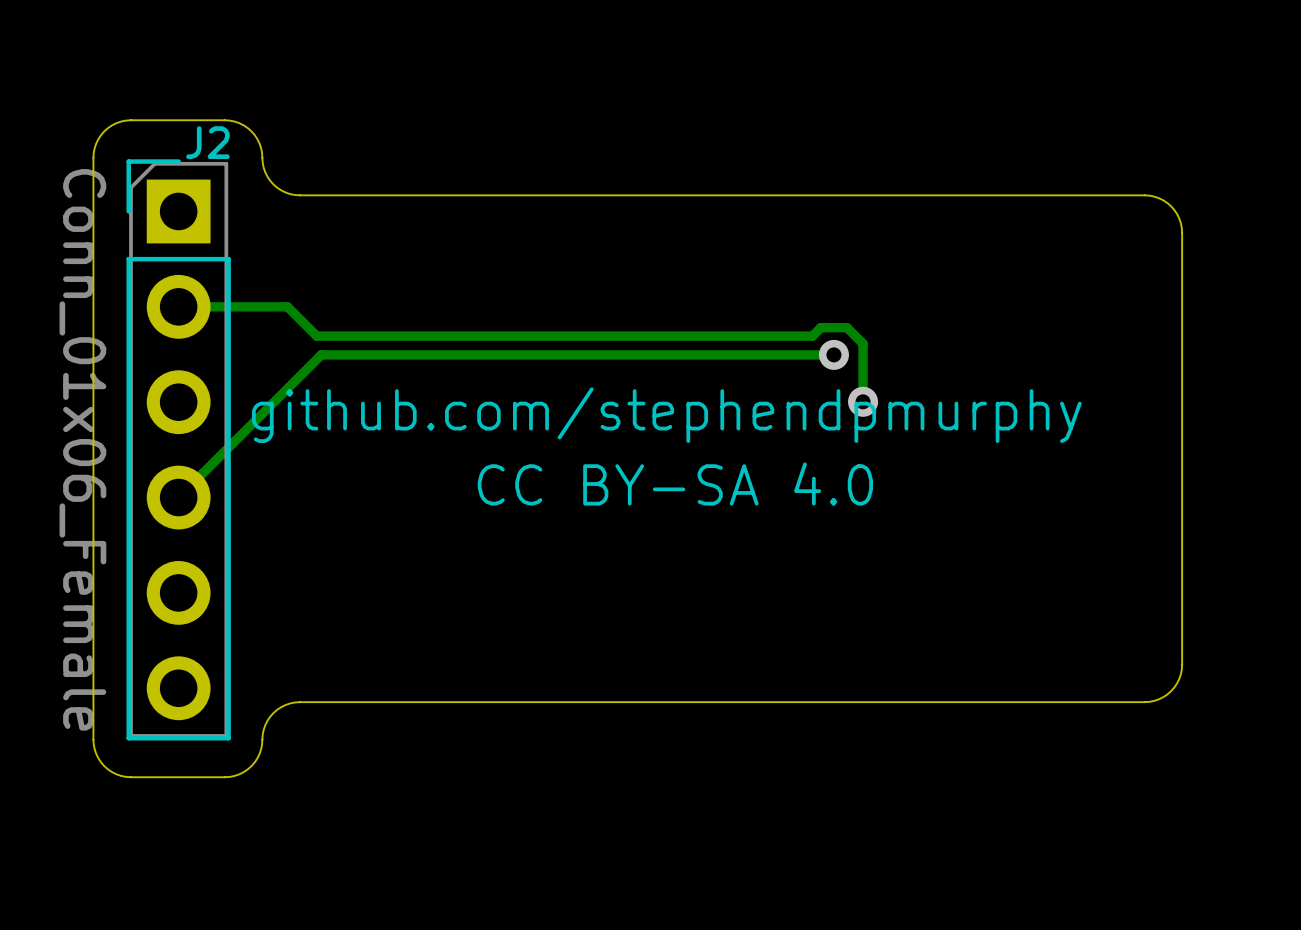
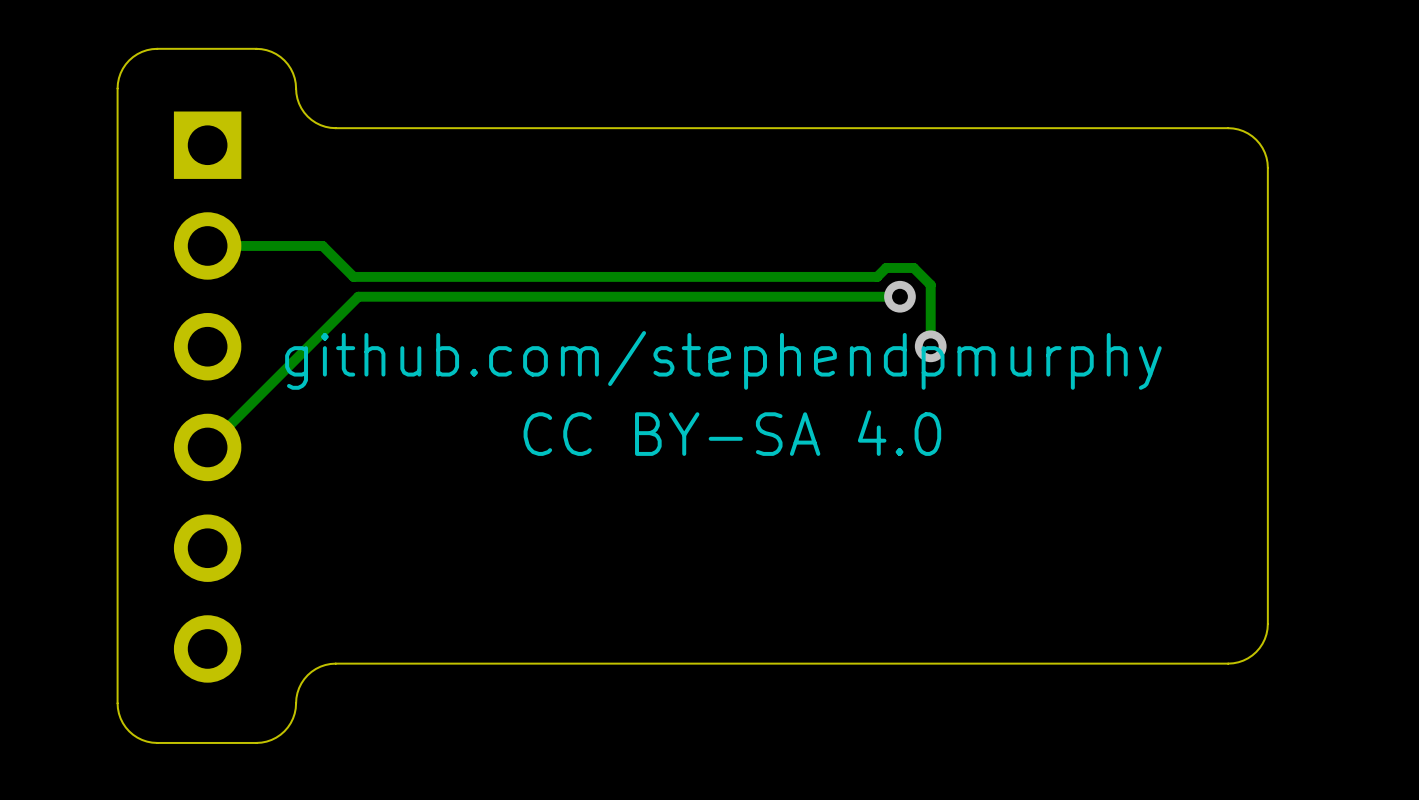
J2 side: bottom (178, 449) -> top (207, 397)

